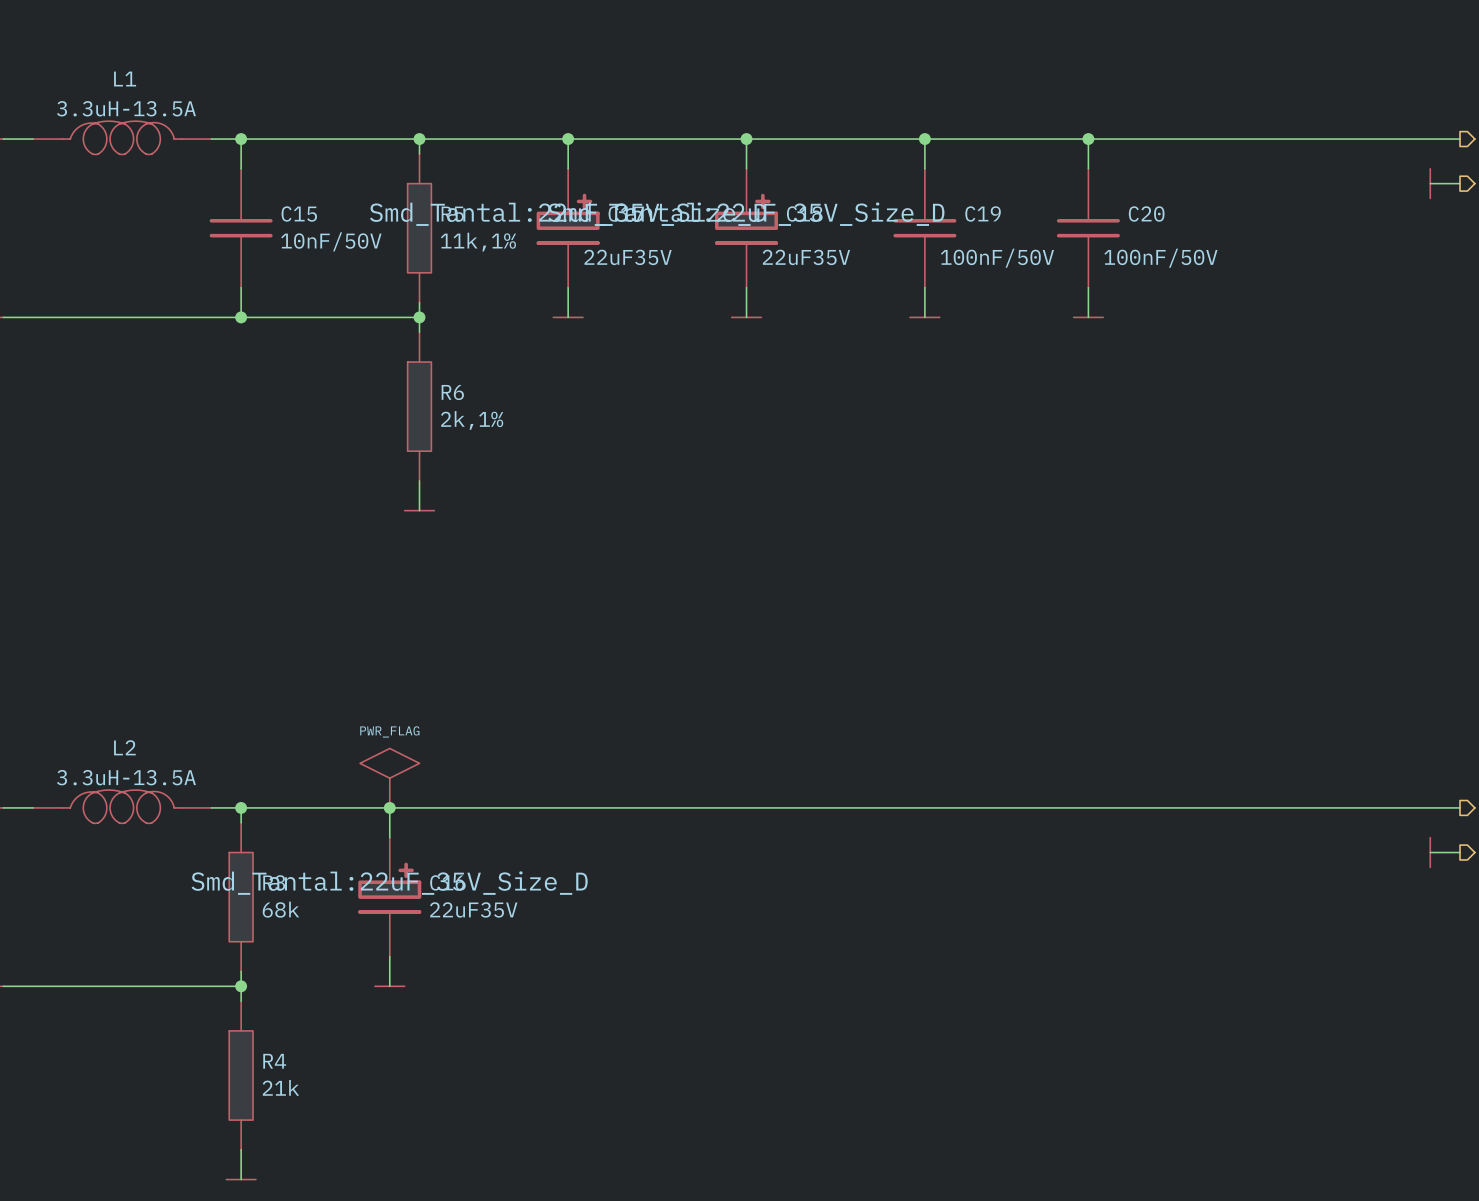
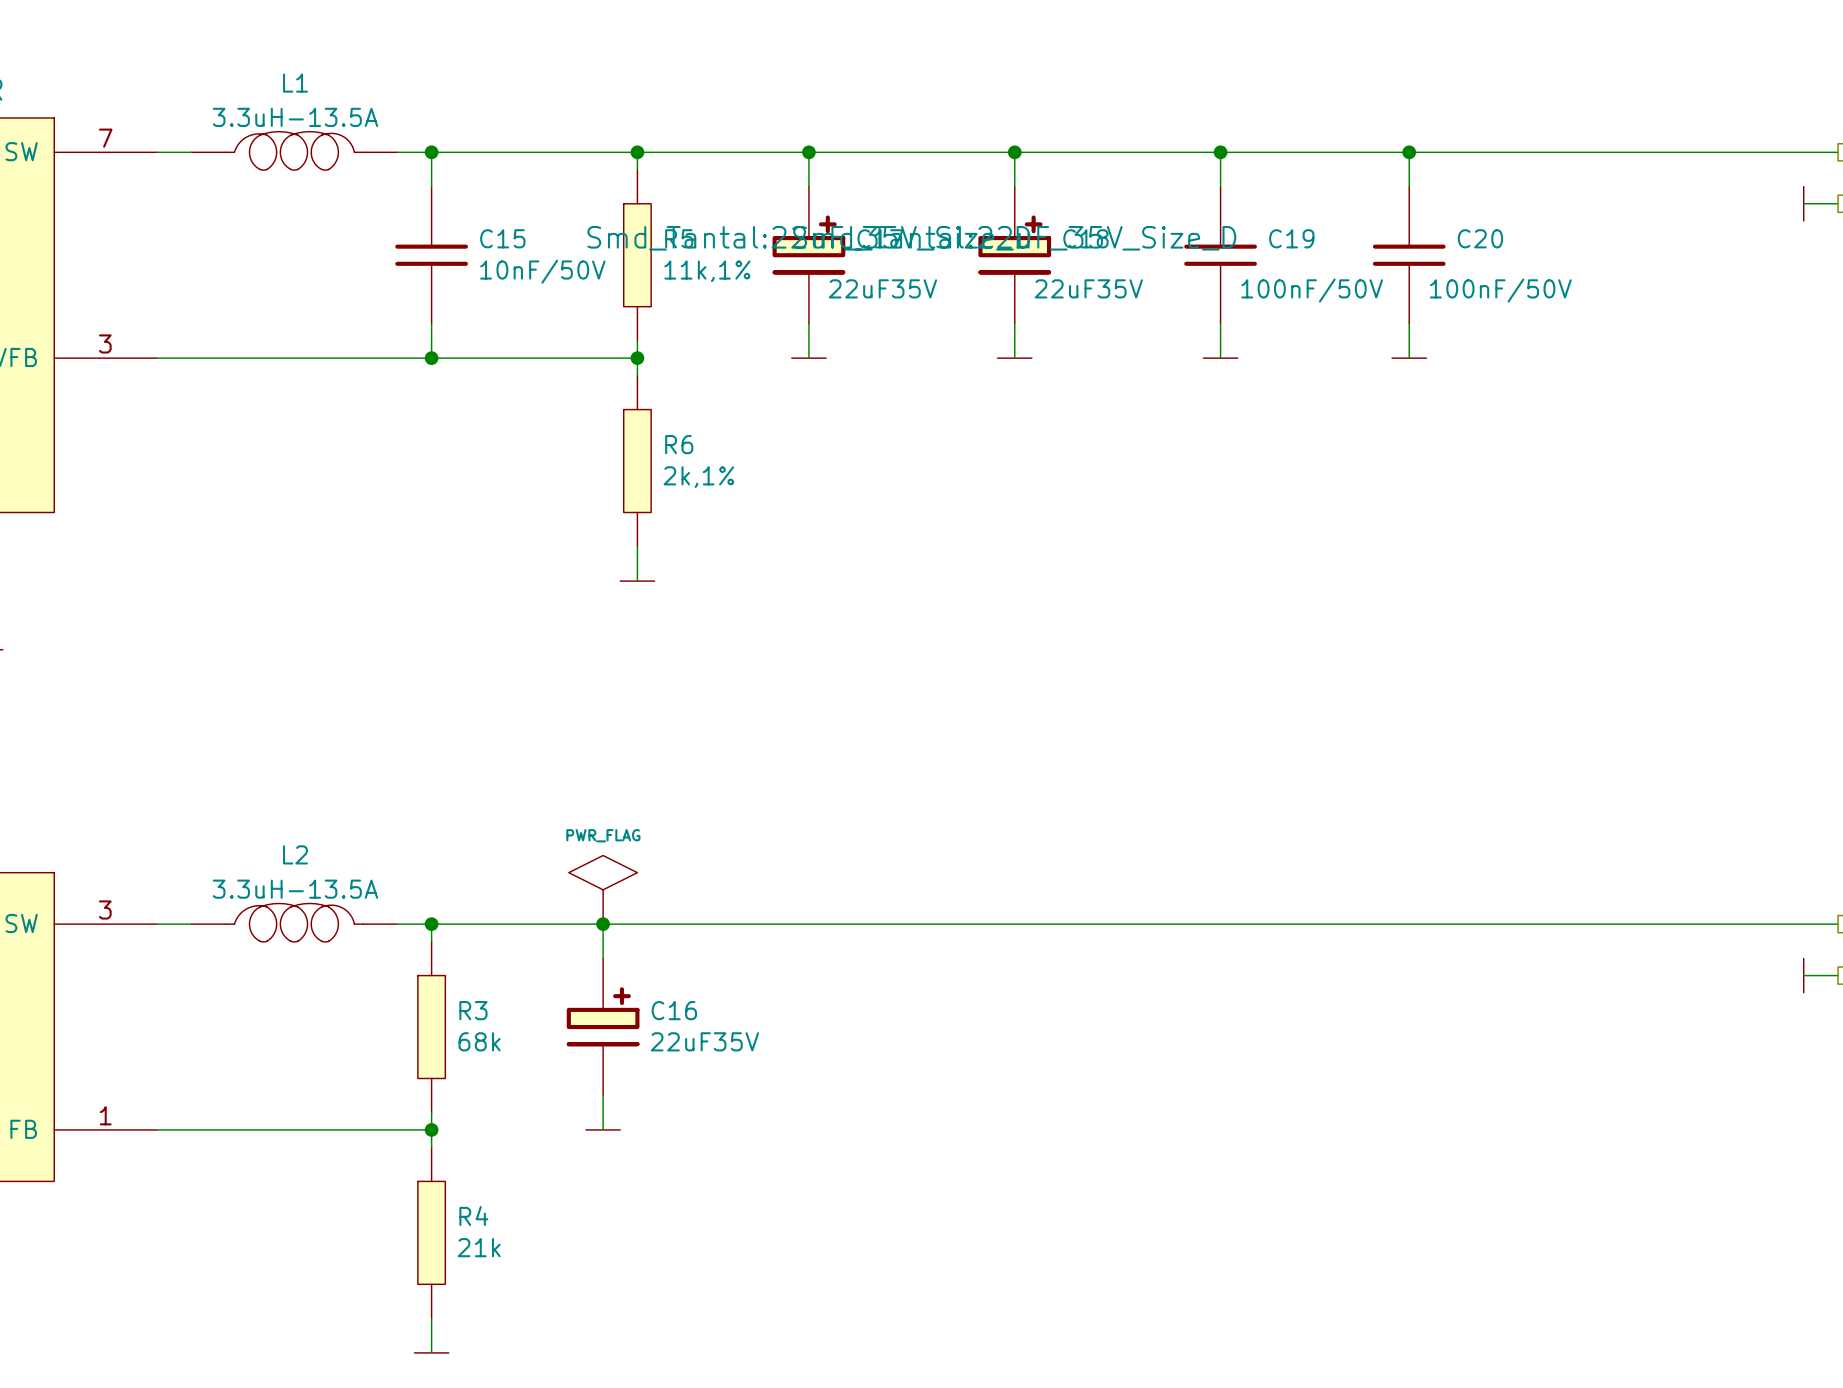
C16 text: Smd_Tantal:22uF_35V_Size_D (389, 883) -> none

